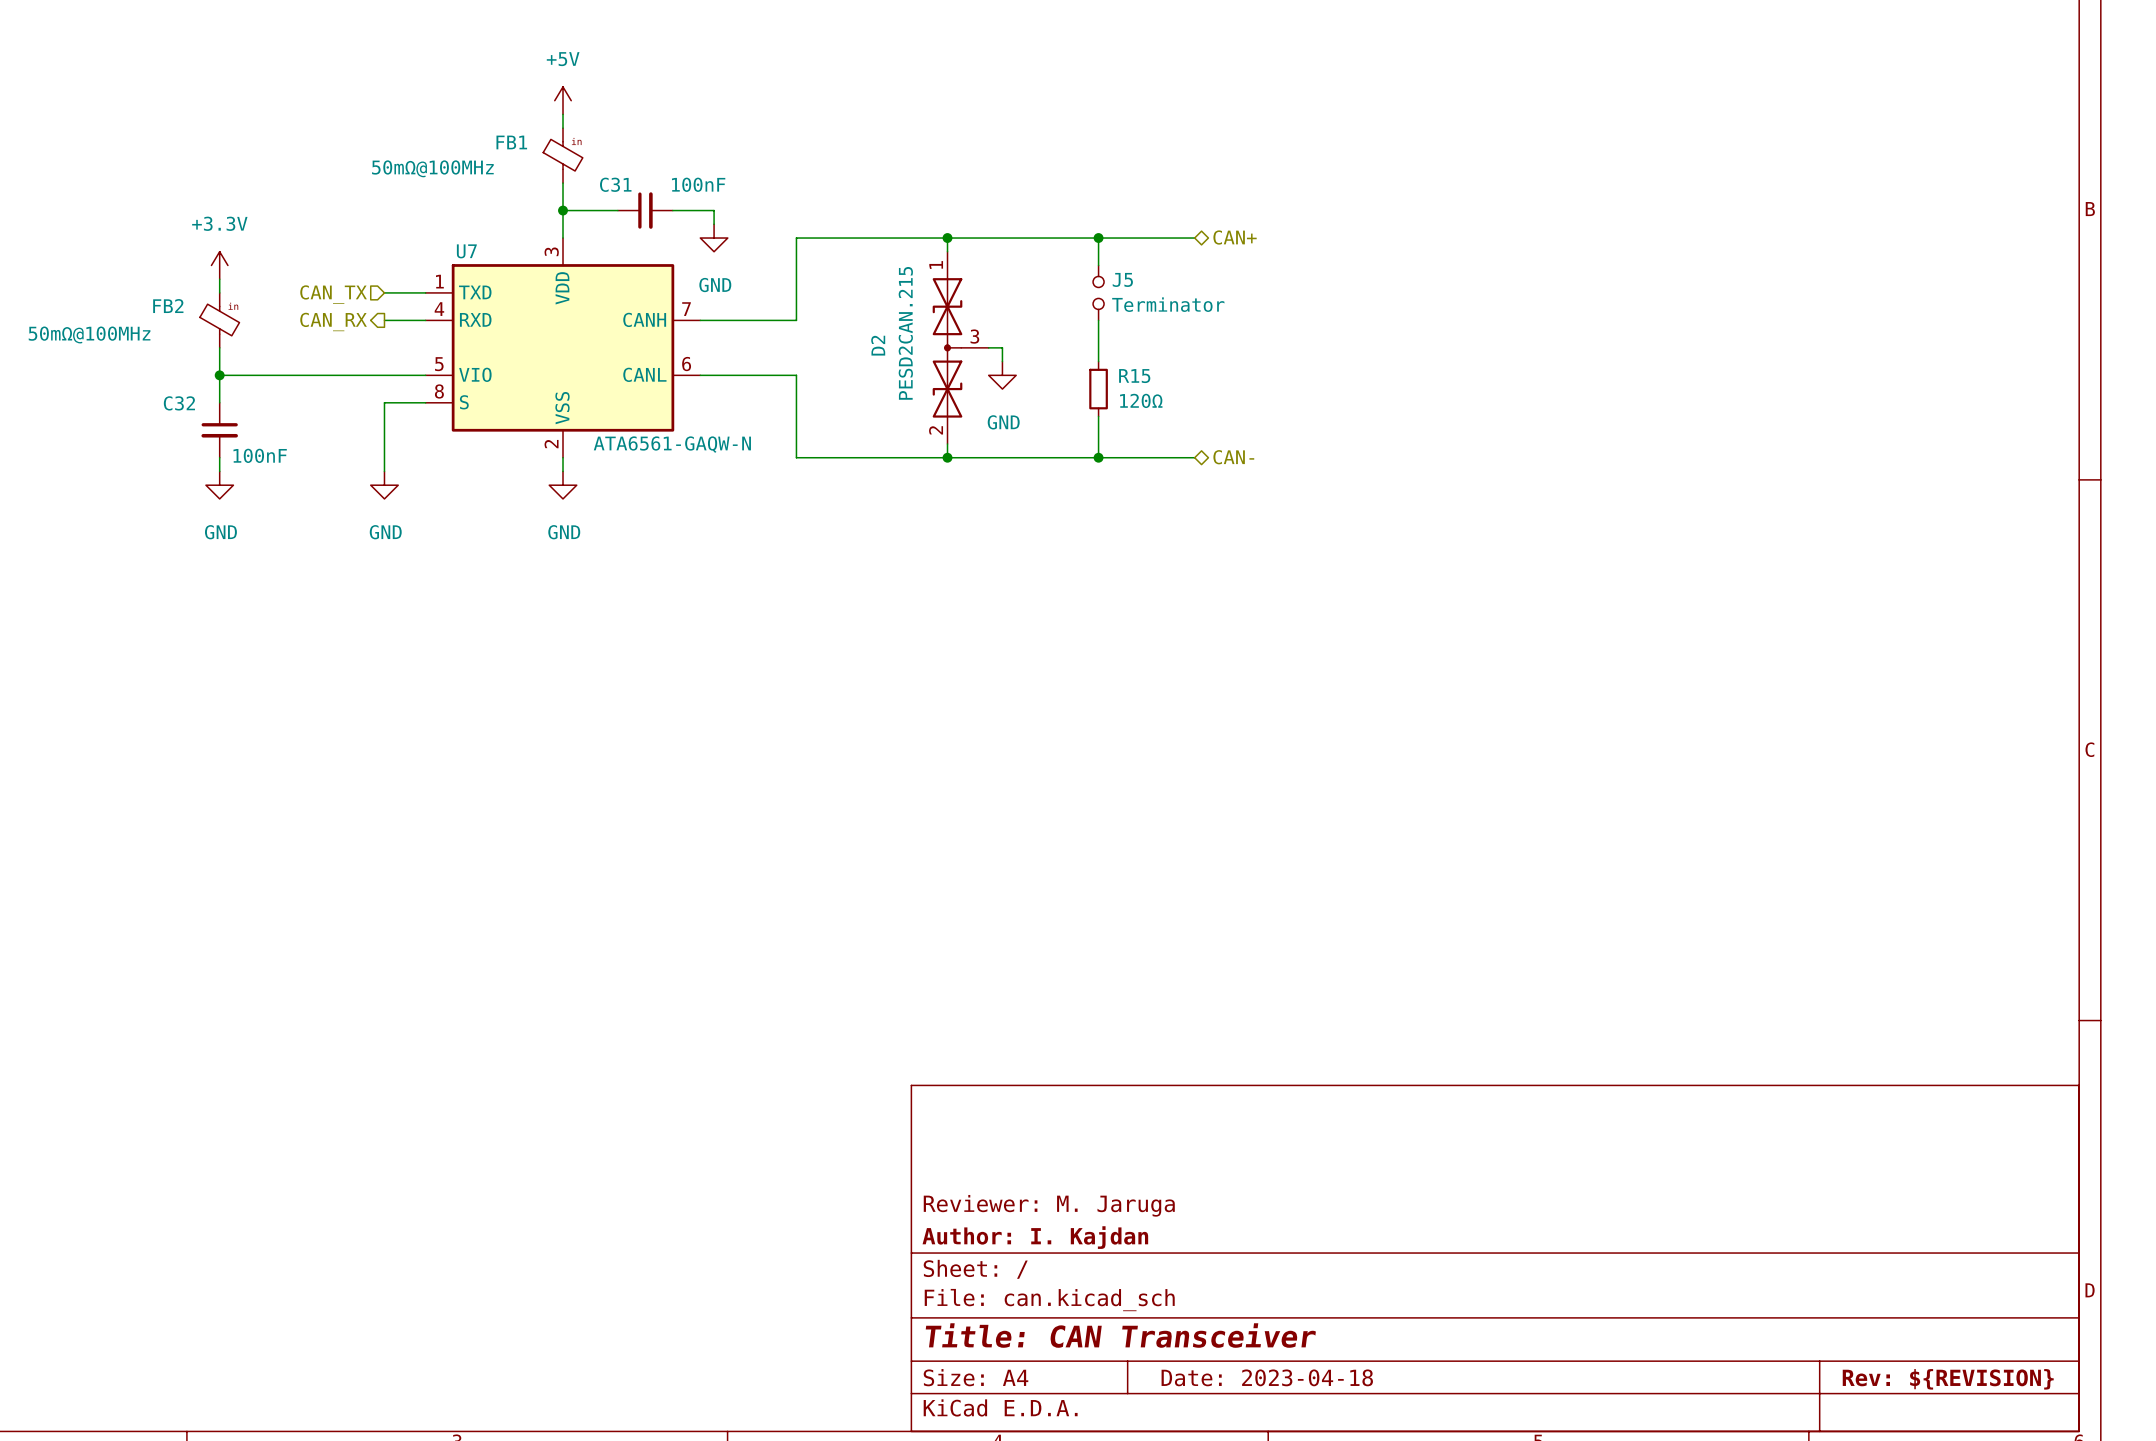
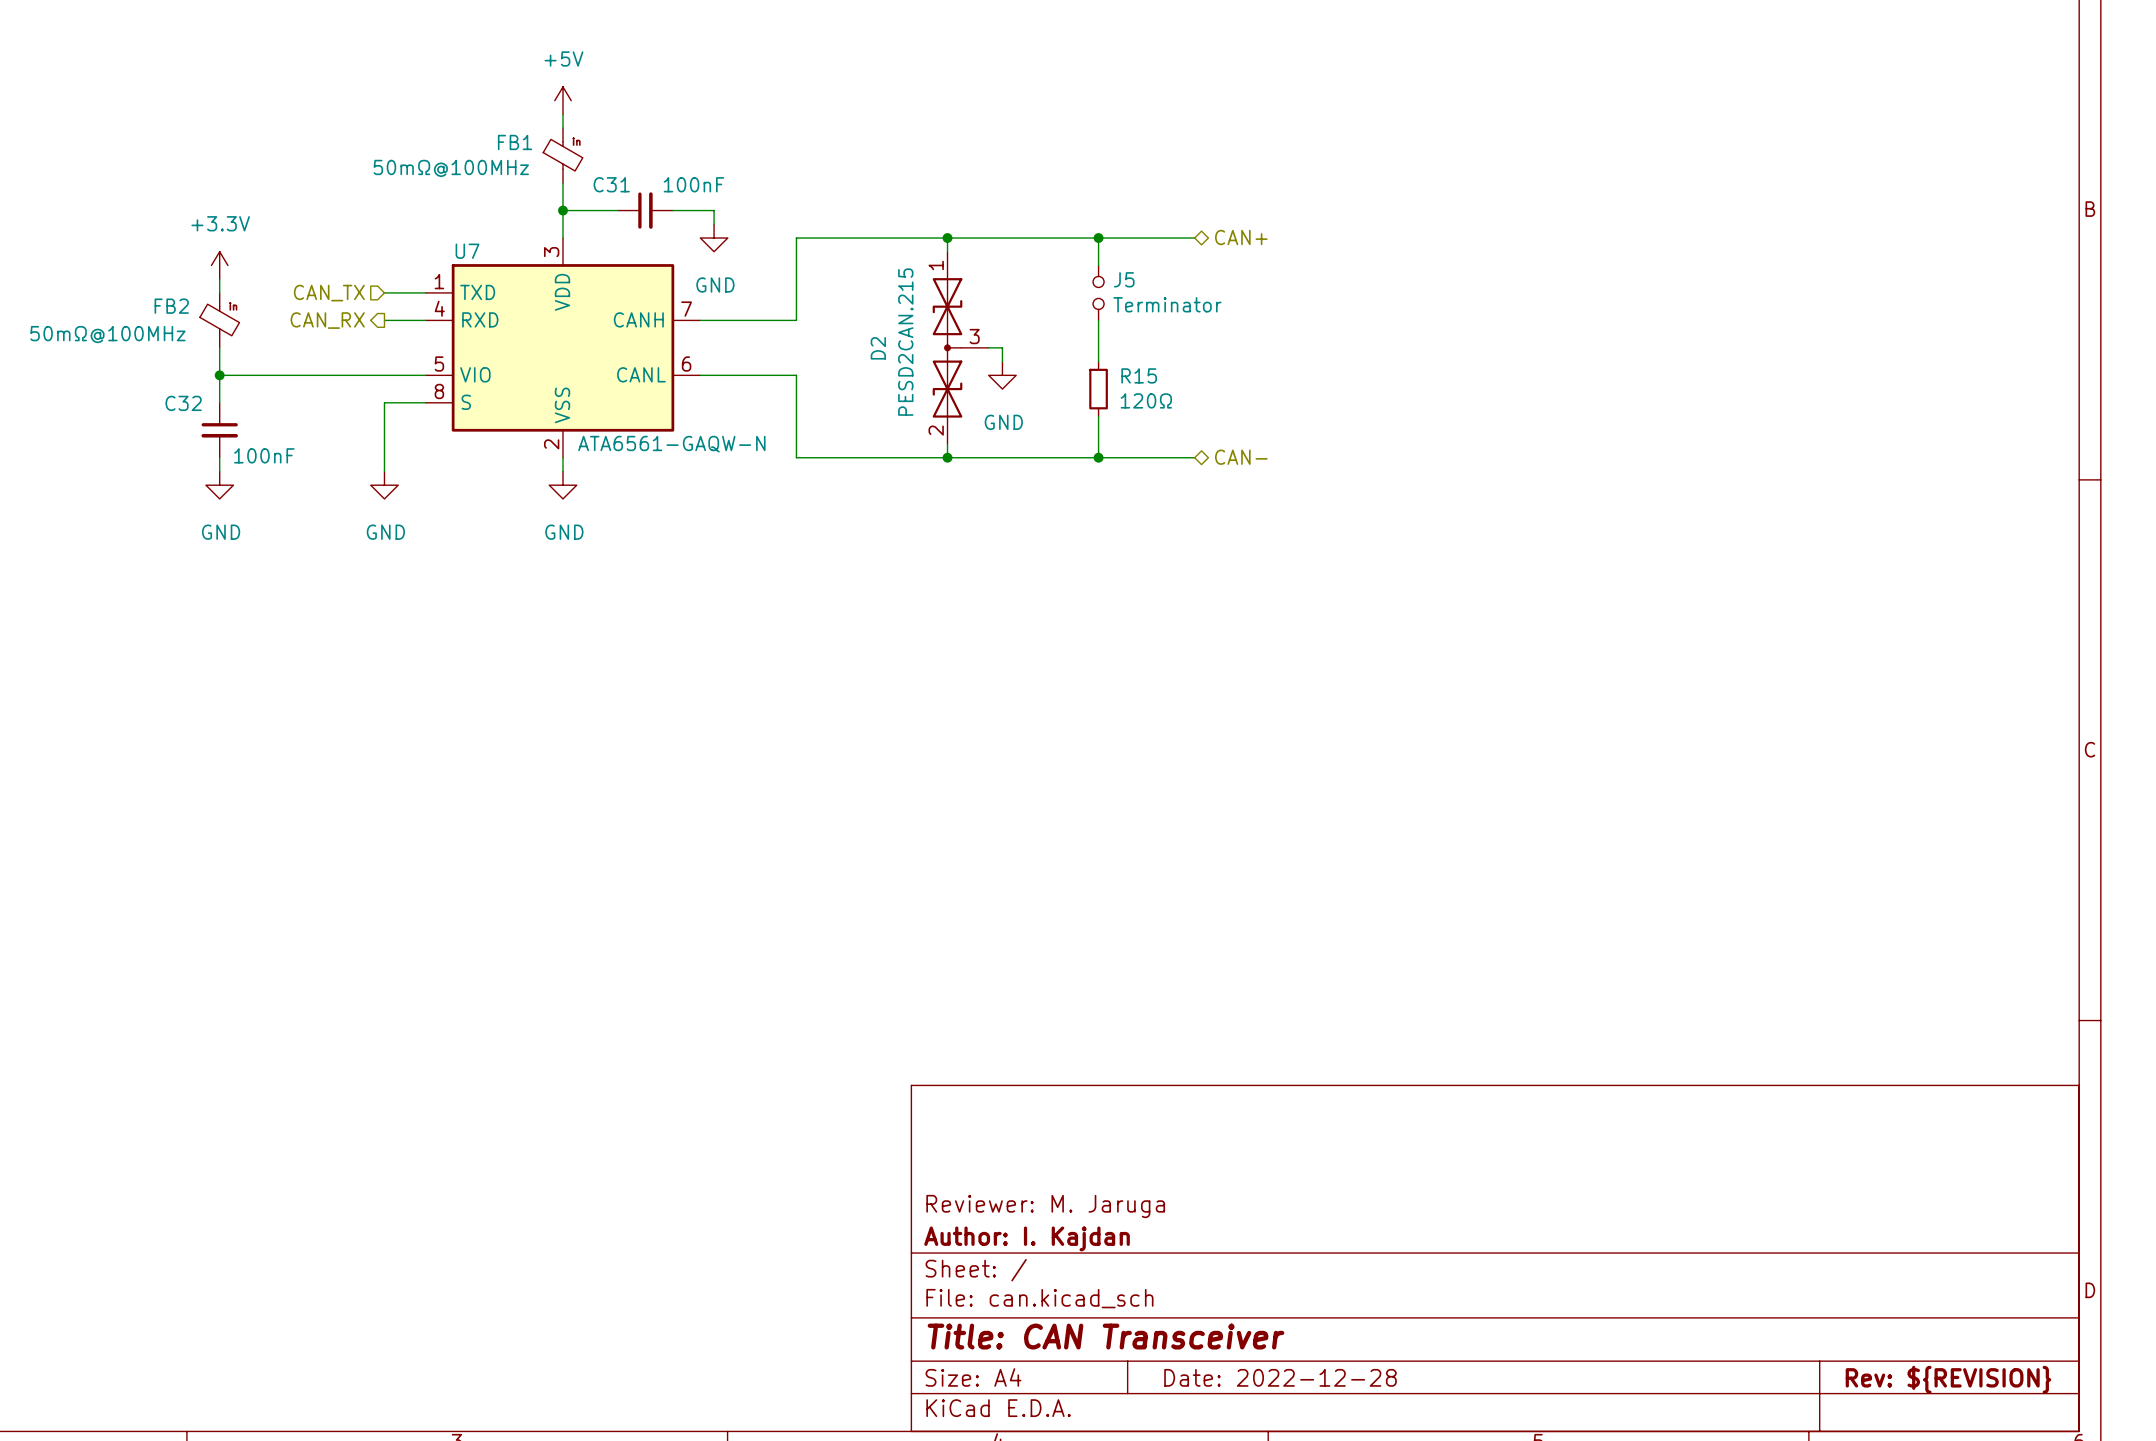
title block: Date: 2023-04-18 (1267, 1377) -> Date: 2022-12-28 (1280, 1377)

